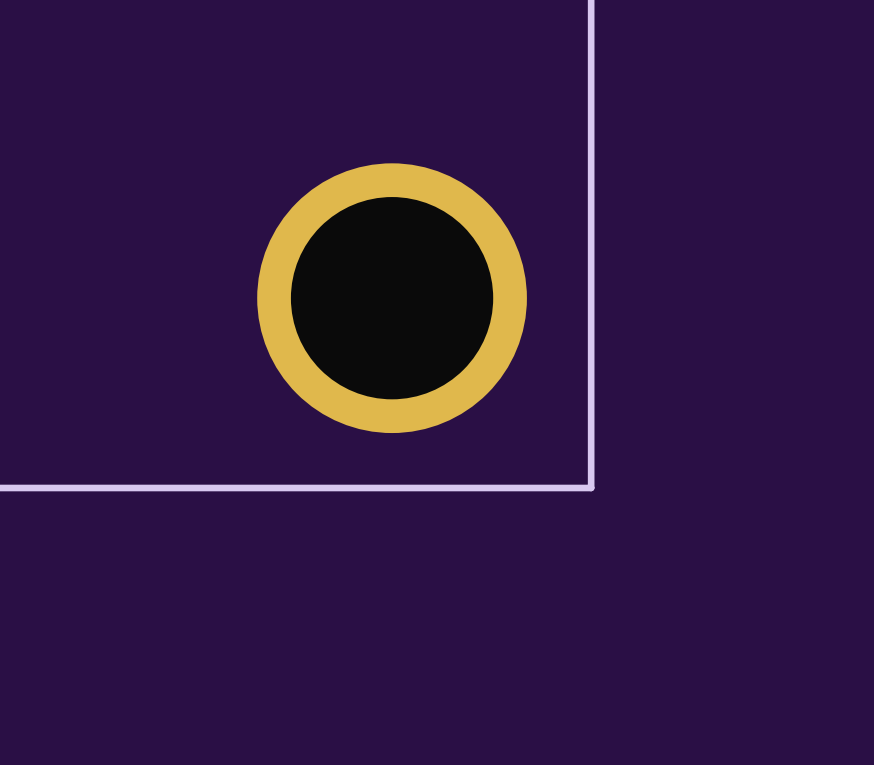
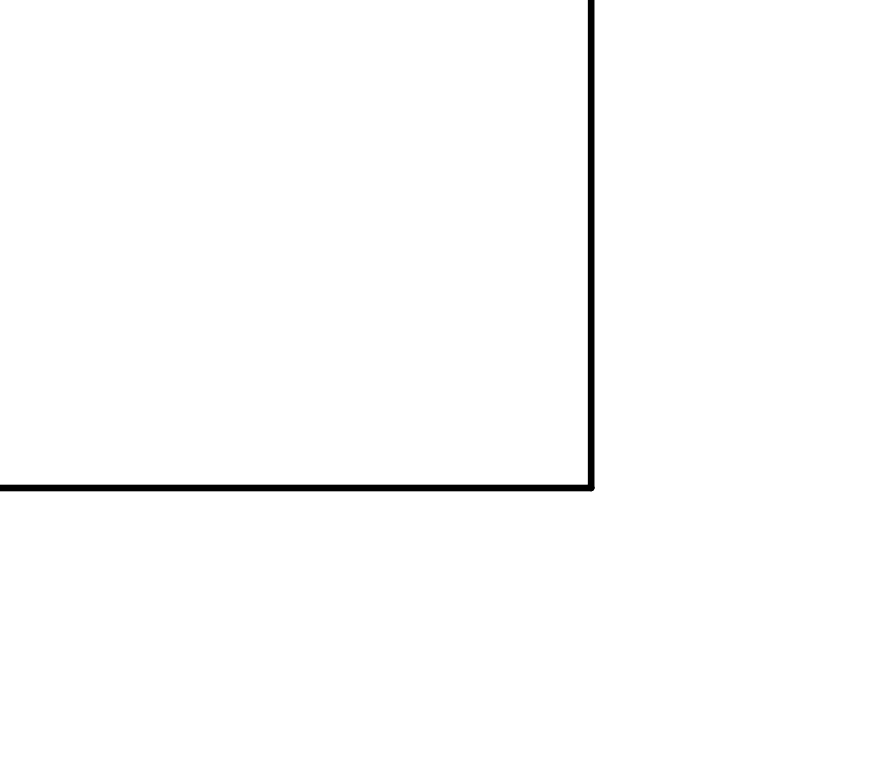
part: (392, 298) -> none

